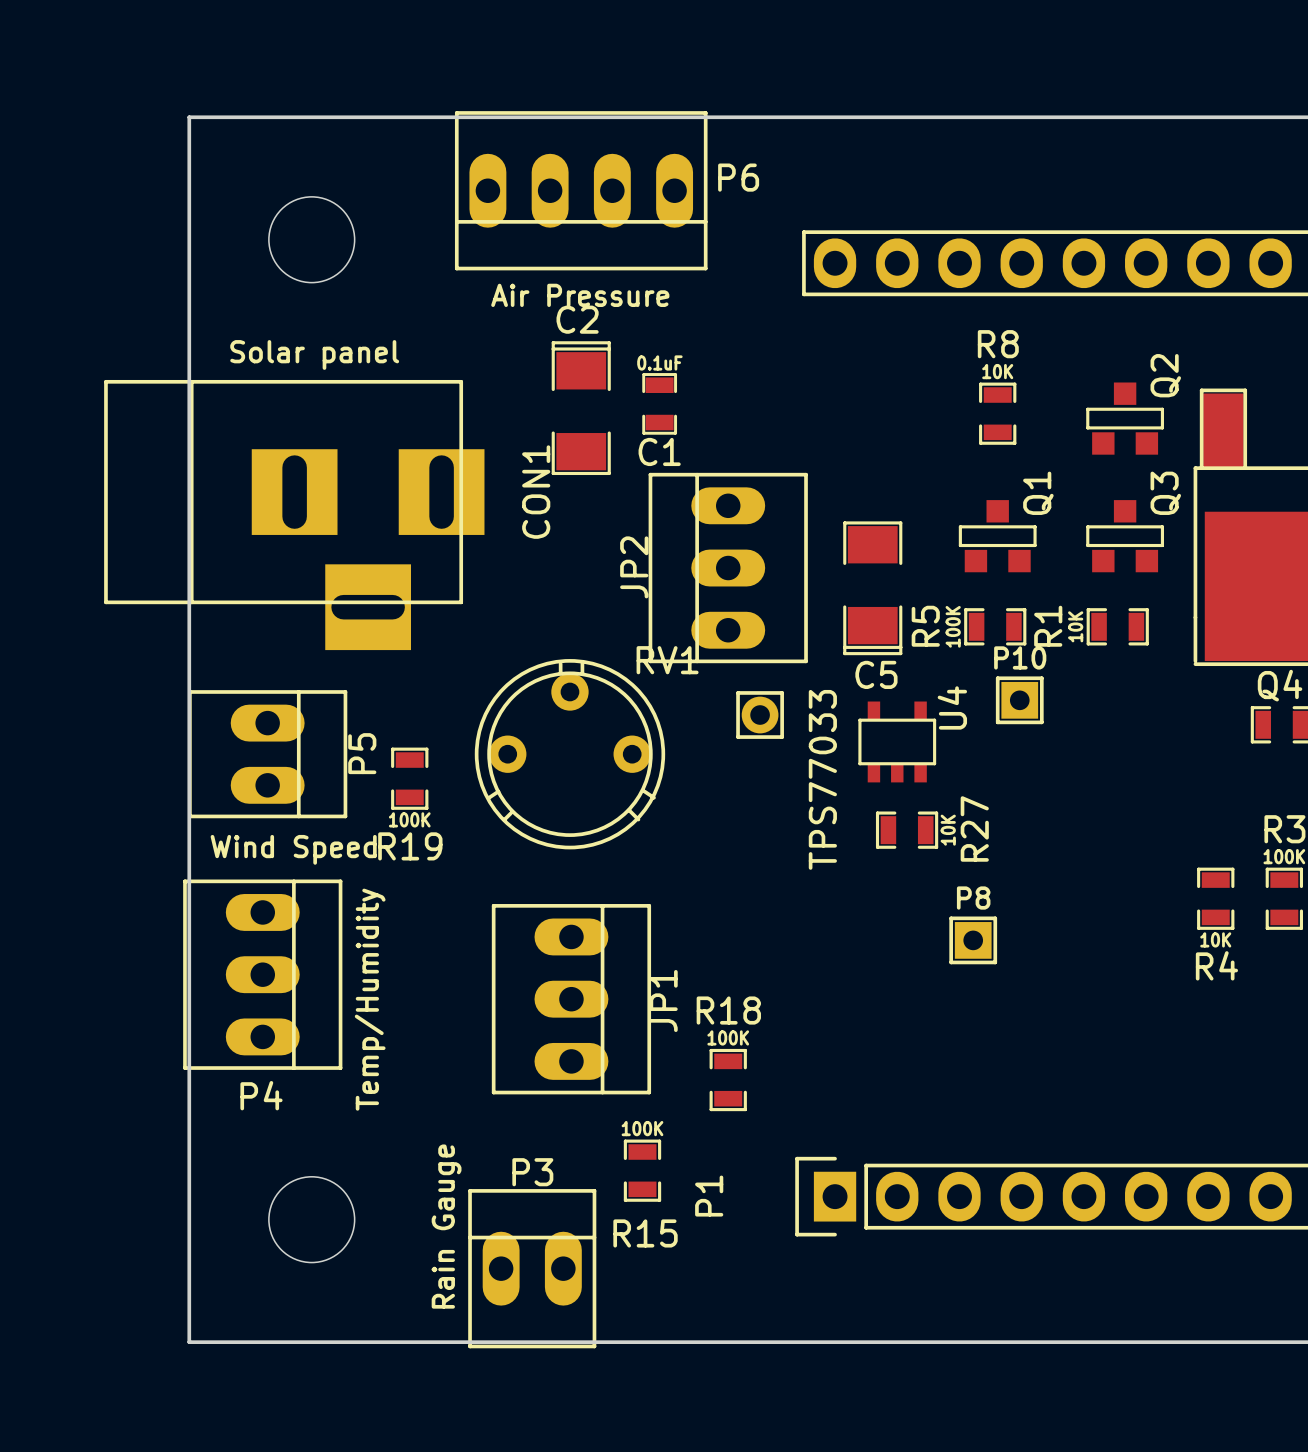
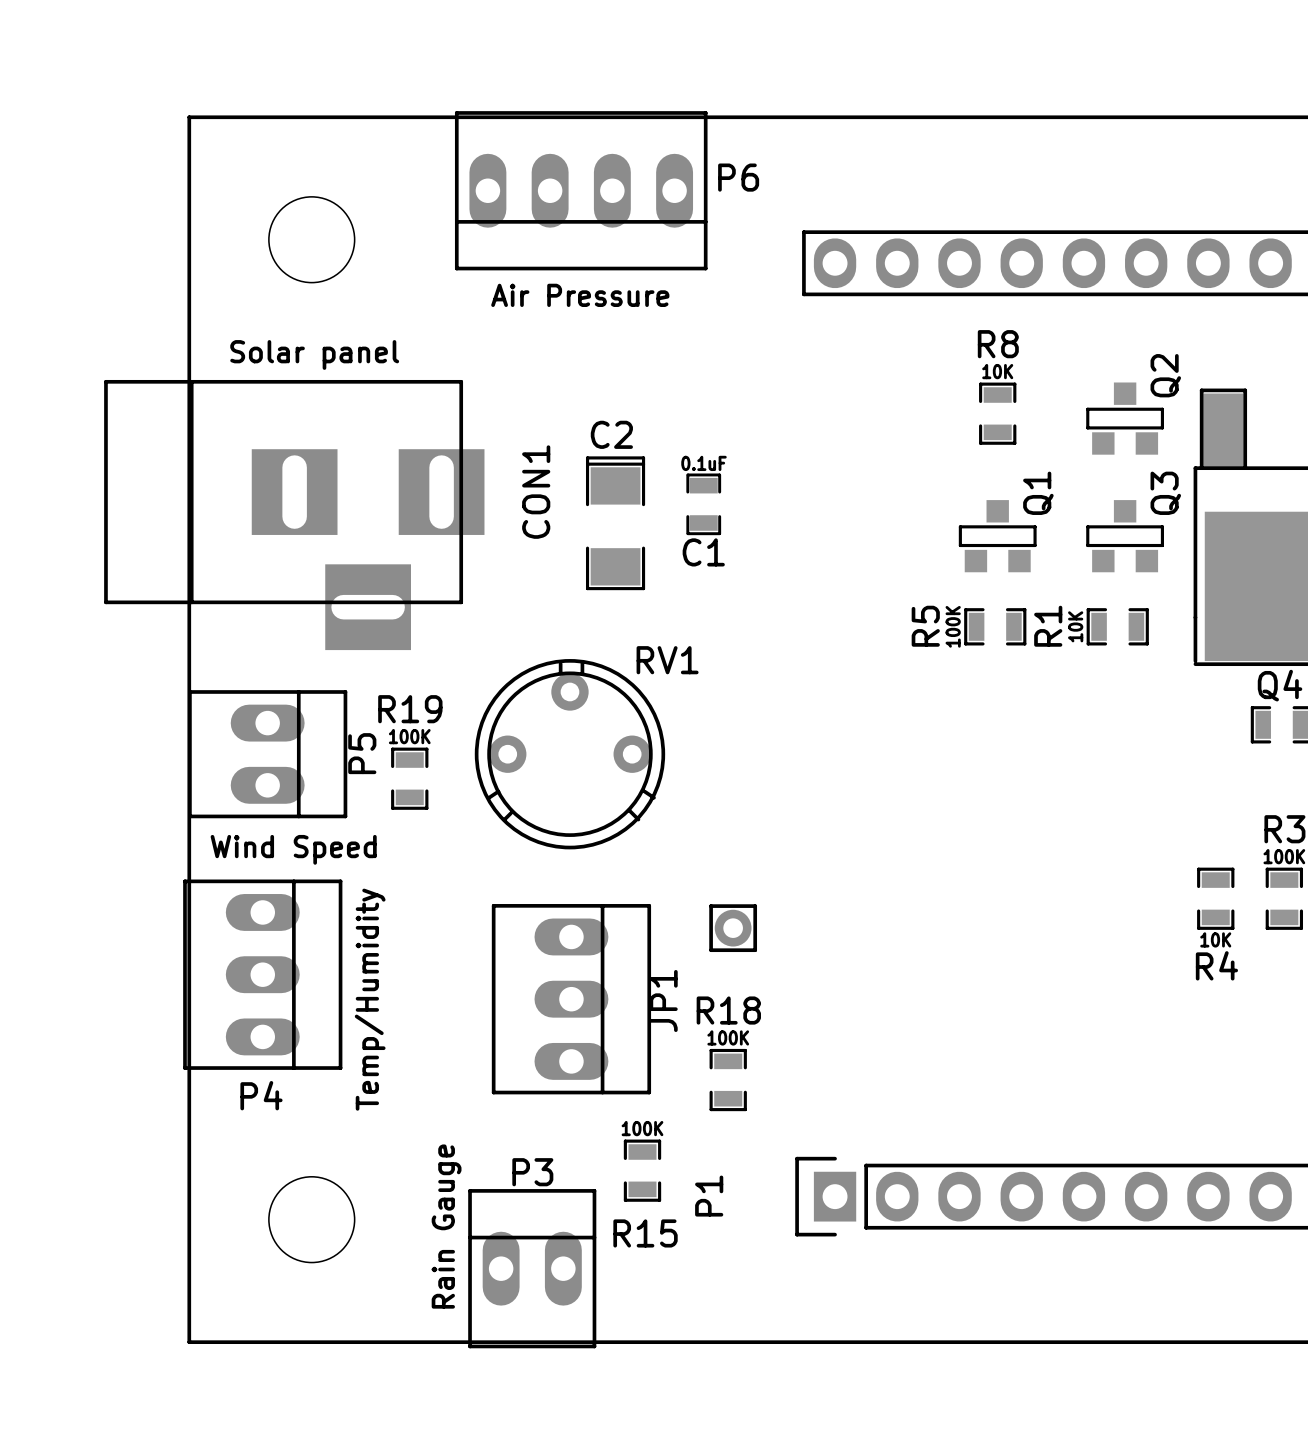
C1 position: (659, 403) -> (703, 504)
C2 position: (581, 408) -> (615, 523)
JP2: (728, 568) -> none
C5: (872, 588) -> none
P10: (1019, 700) -> none
part position: (760, 715) -> (733, 928)
U4: TPS77033 (897, 741) -> none
R19 value position: 100K (409, 819) -> 100K (409, 736)
R27: 10K (907, 830) -> none
R19 name position: R19 (410, 846) -> R19 (410, 709)
P8: (973, 940) -> none

